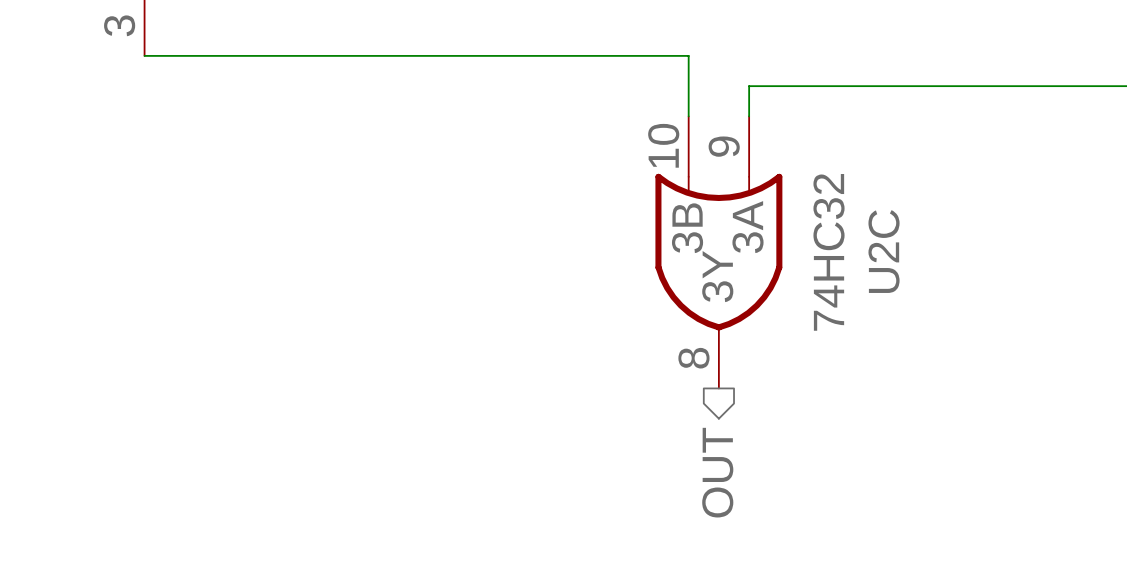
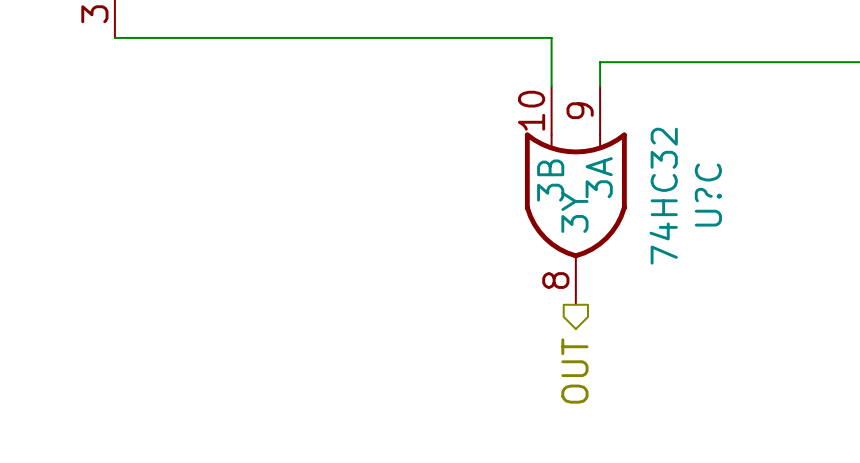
U2C name: U2C (884, 251) -> U?C (708, 195)

